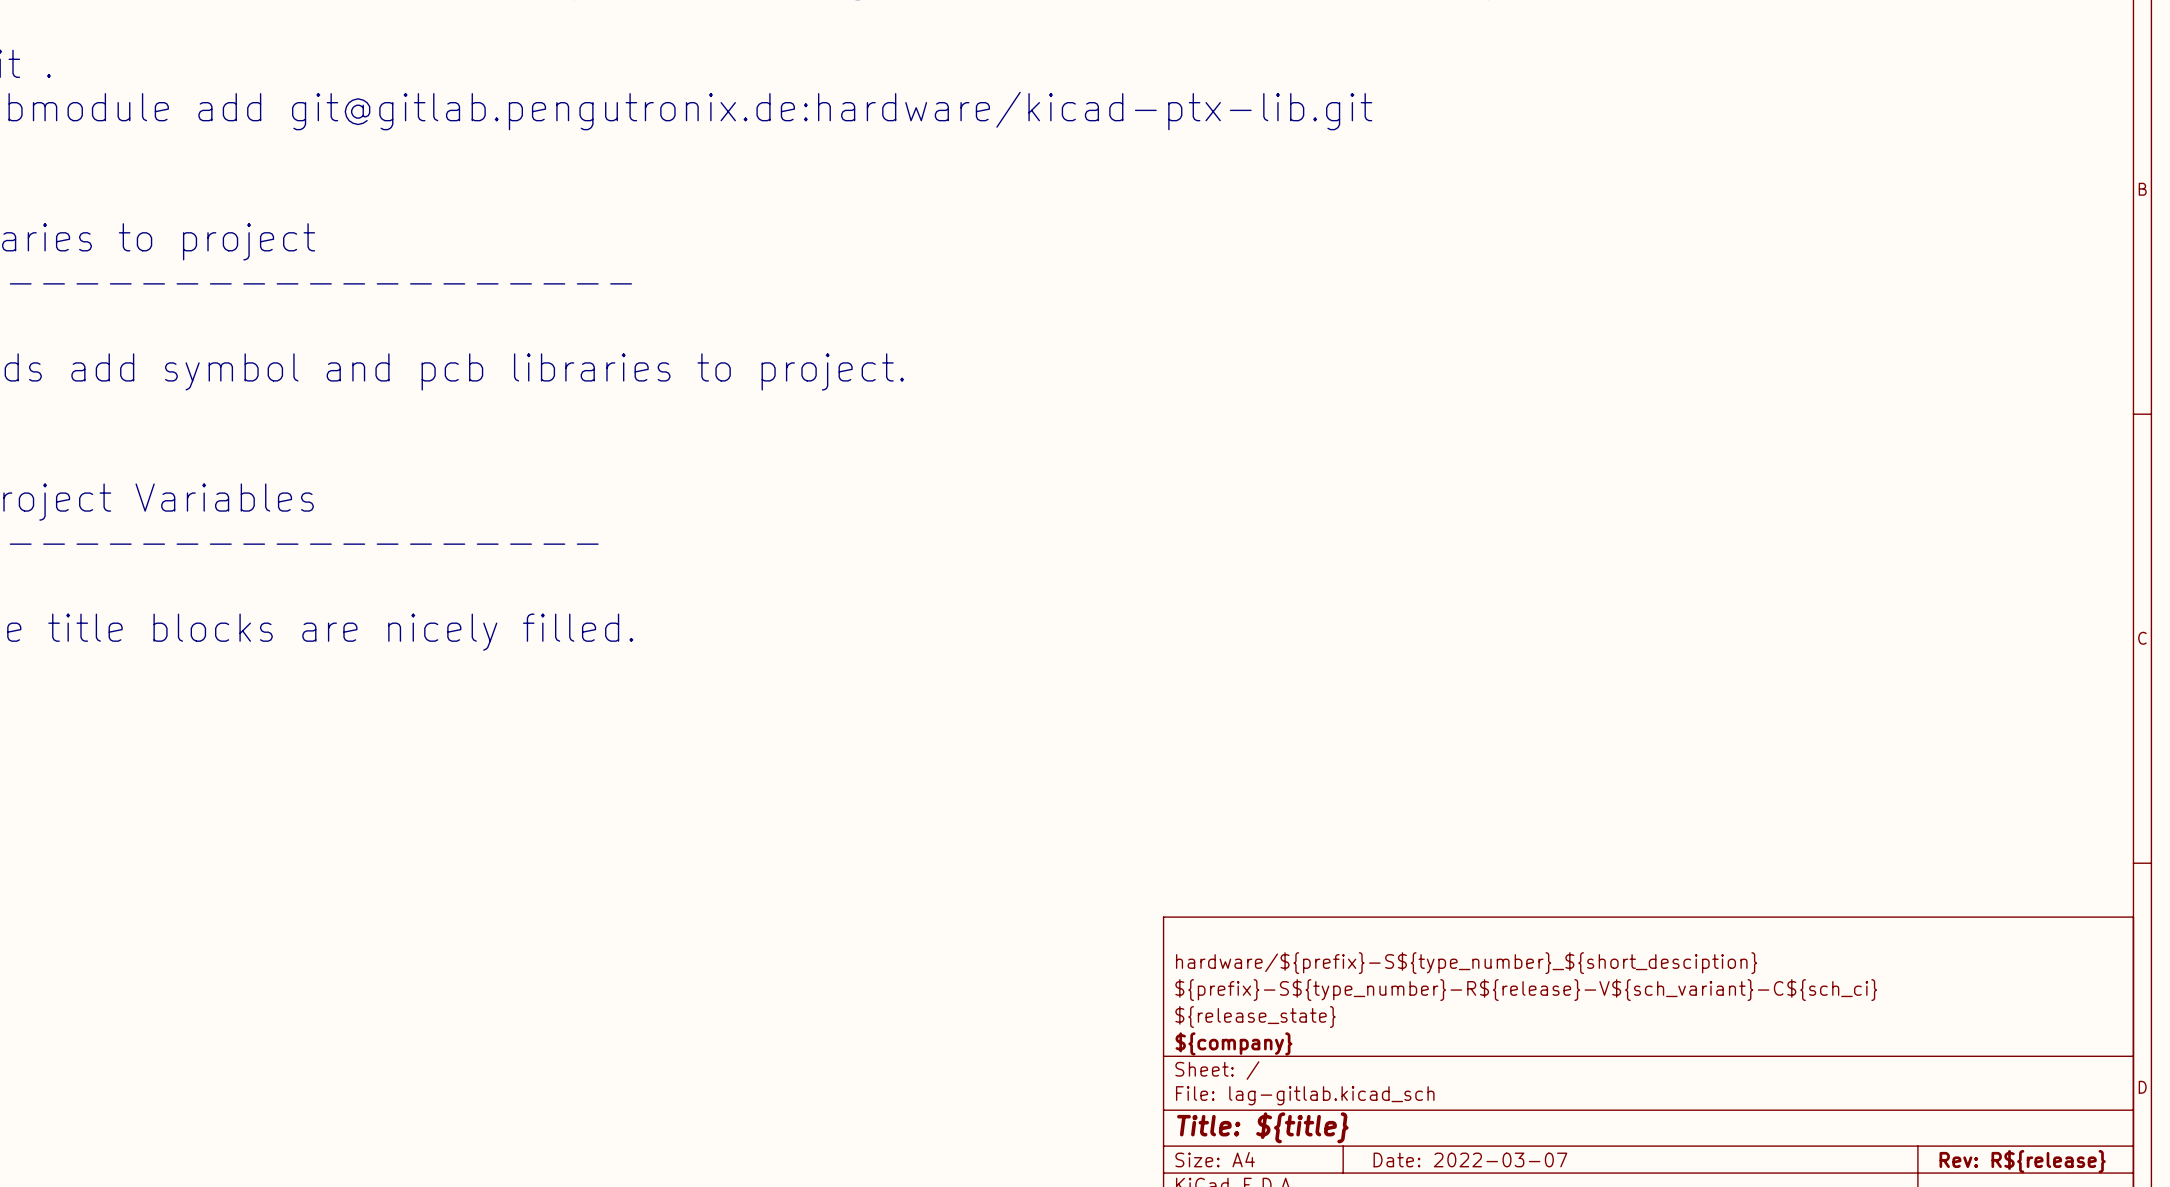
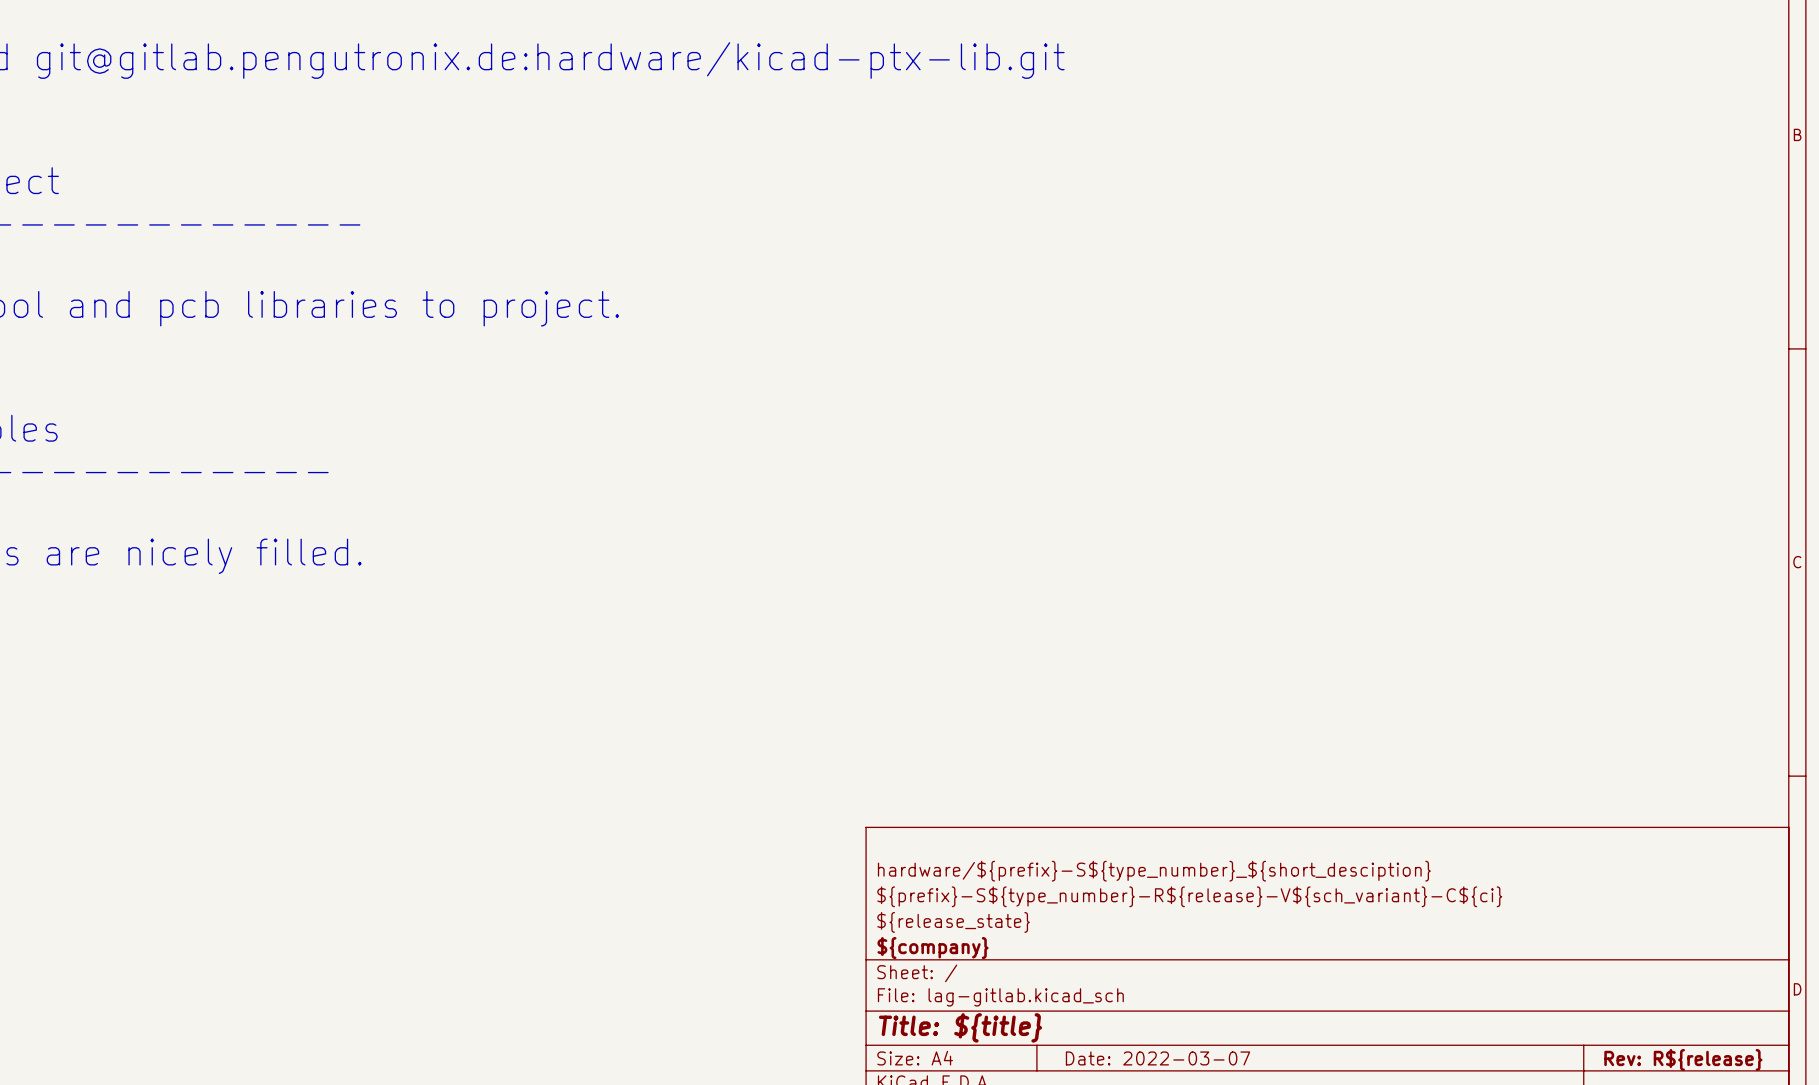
title block: ${prefix}-S${type_number}-R${release}-V${sch_variant}-C${sch_ci} (1526, 990) -> ${prefix}-S${type_number}-R${release}-V${sch_variant}-C${ci} (1189, 896)

